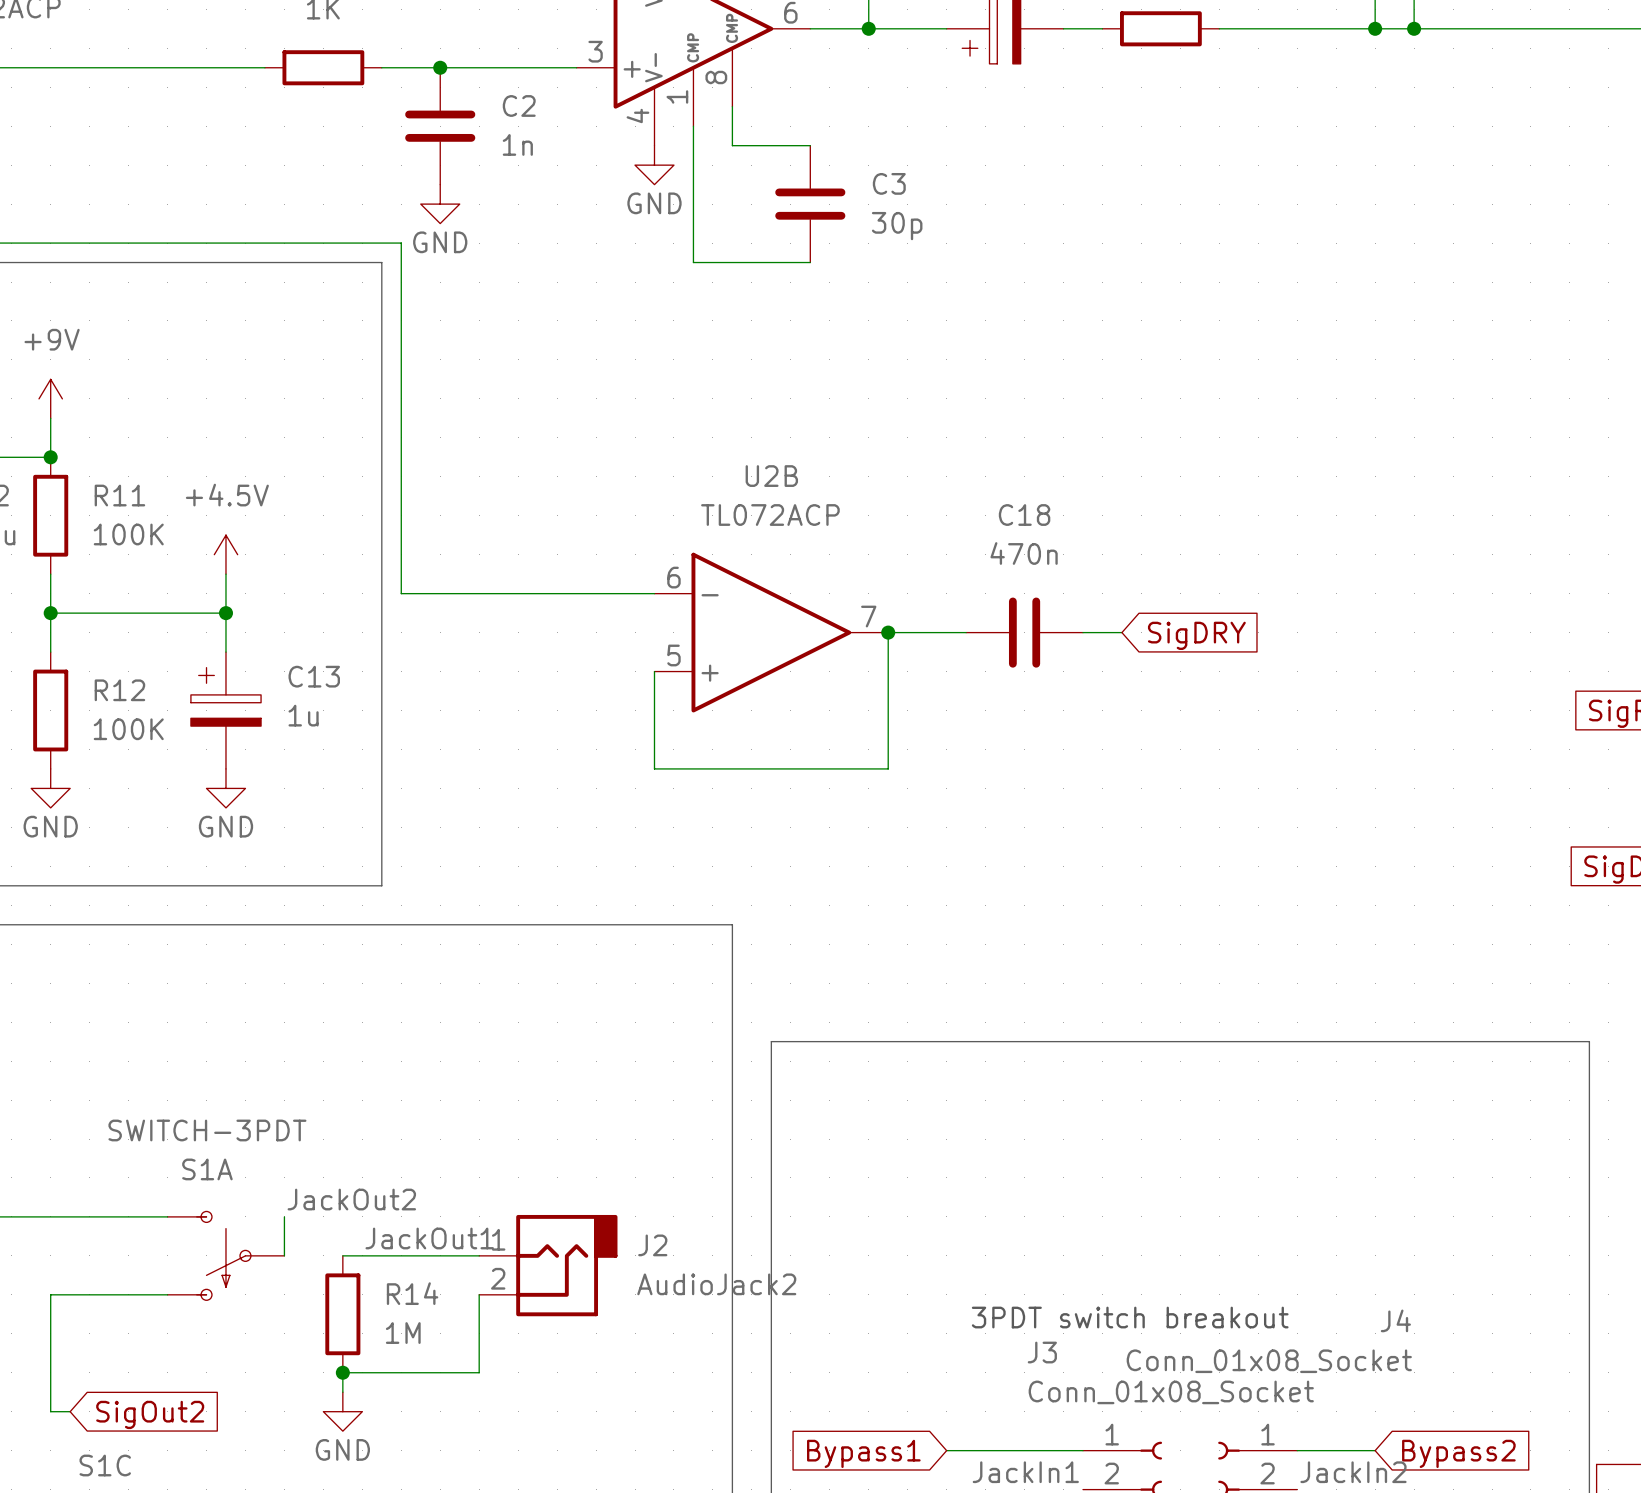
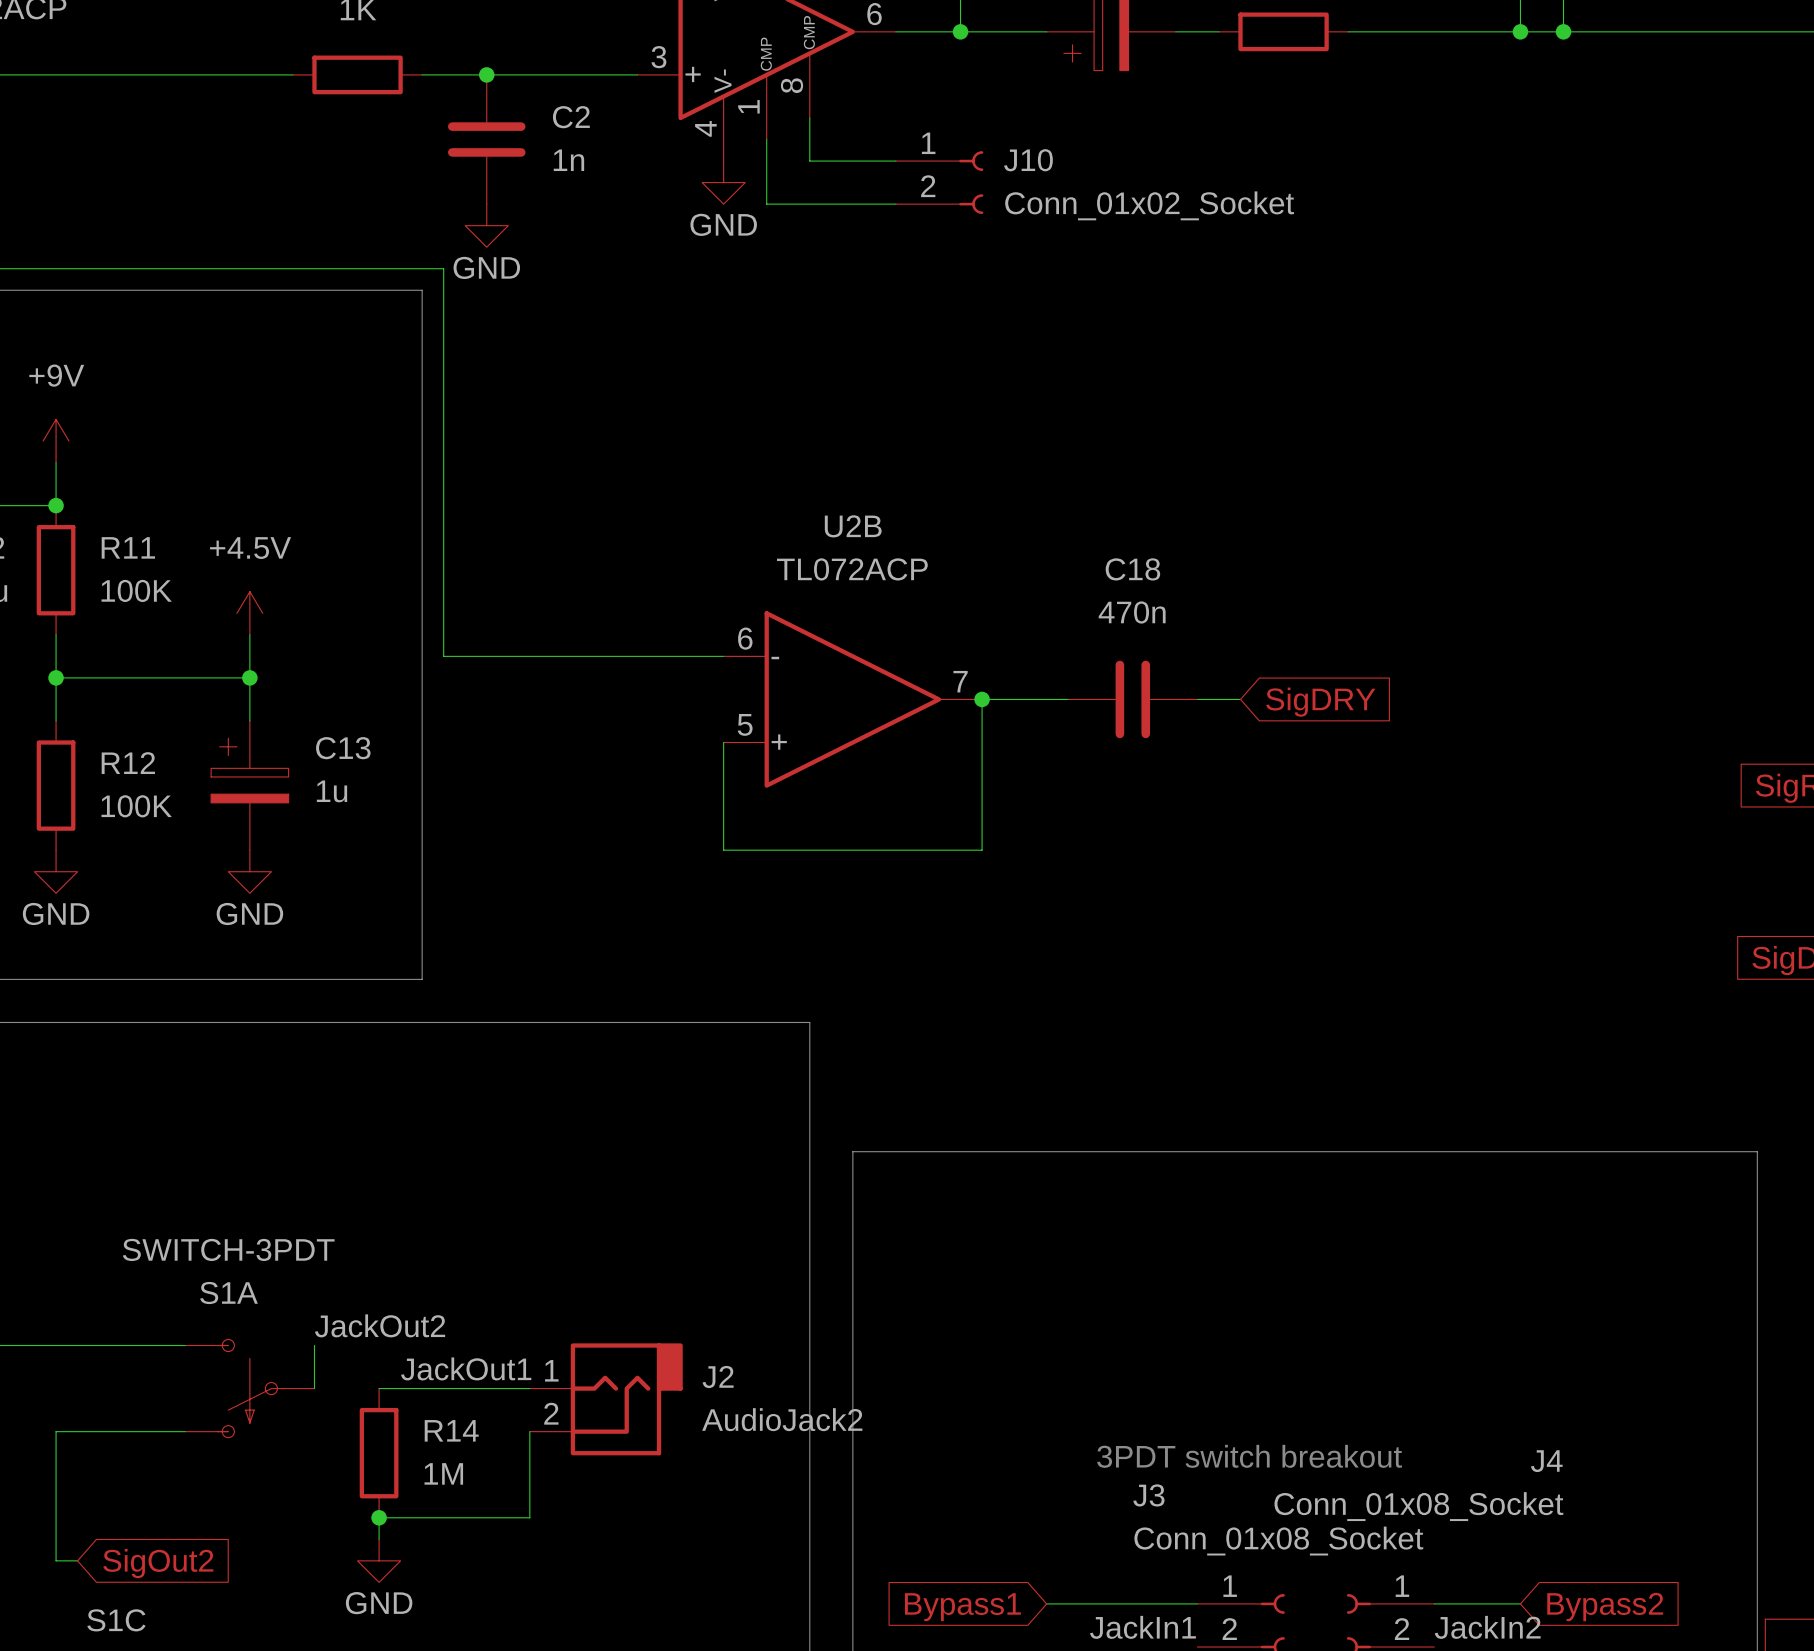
J10: none -> Conn_01x02_Socket (939, 182)
wire: (693, 184) (693, 262) (810, 262) -> (766, 204) (895, 204)
C3: 30p (810, 204) -> none

